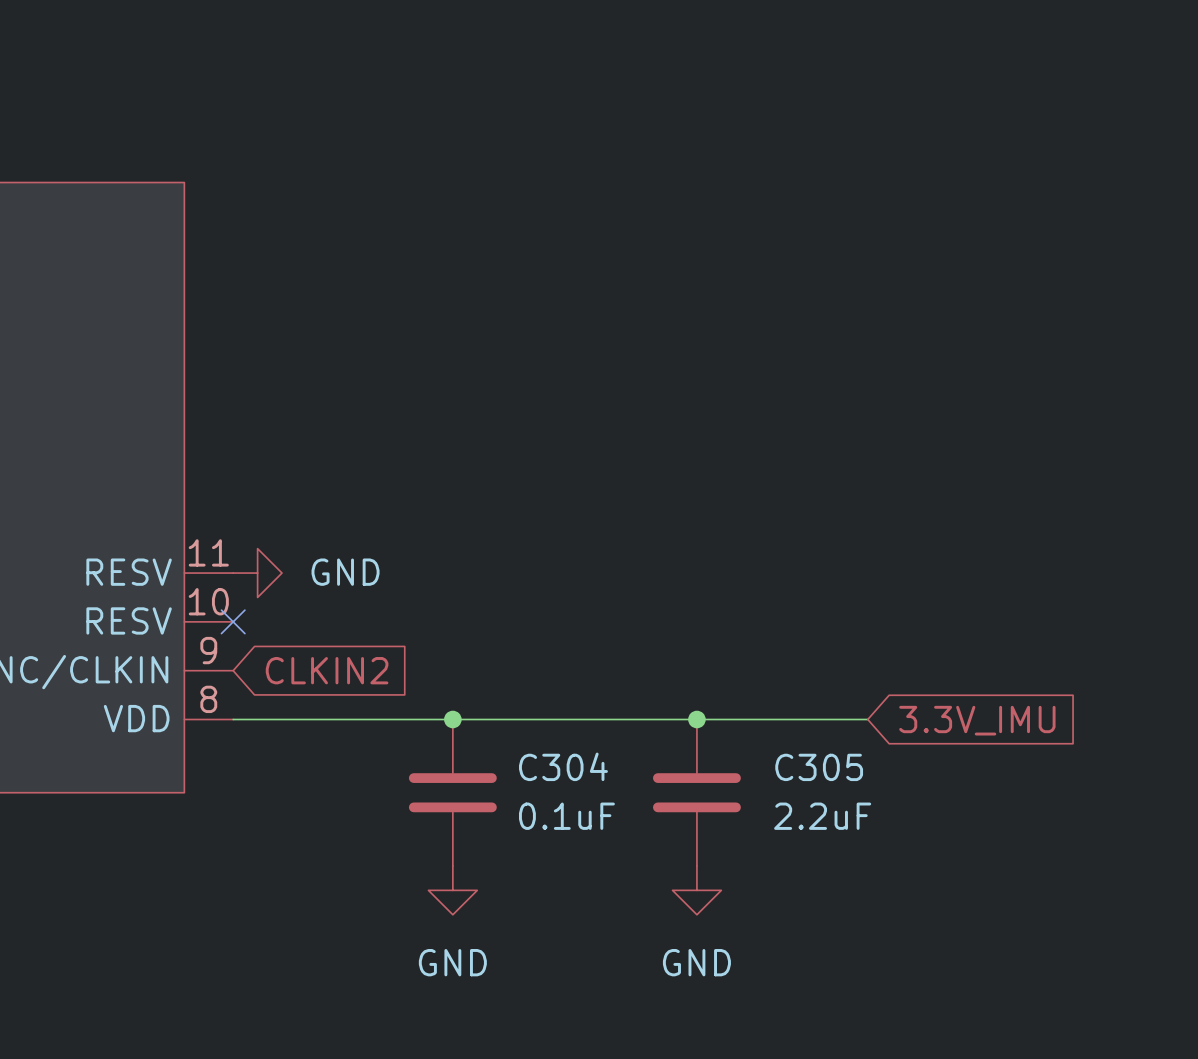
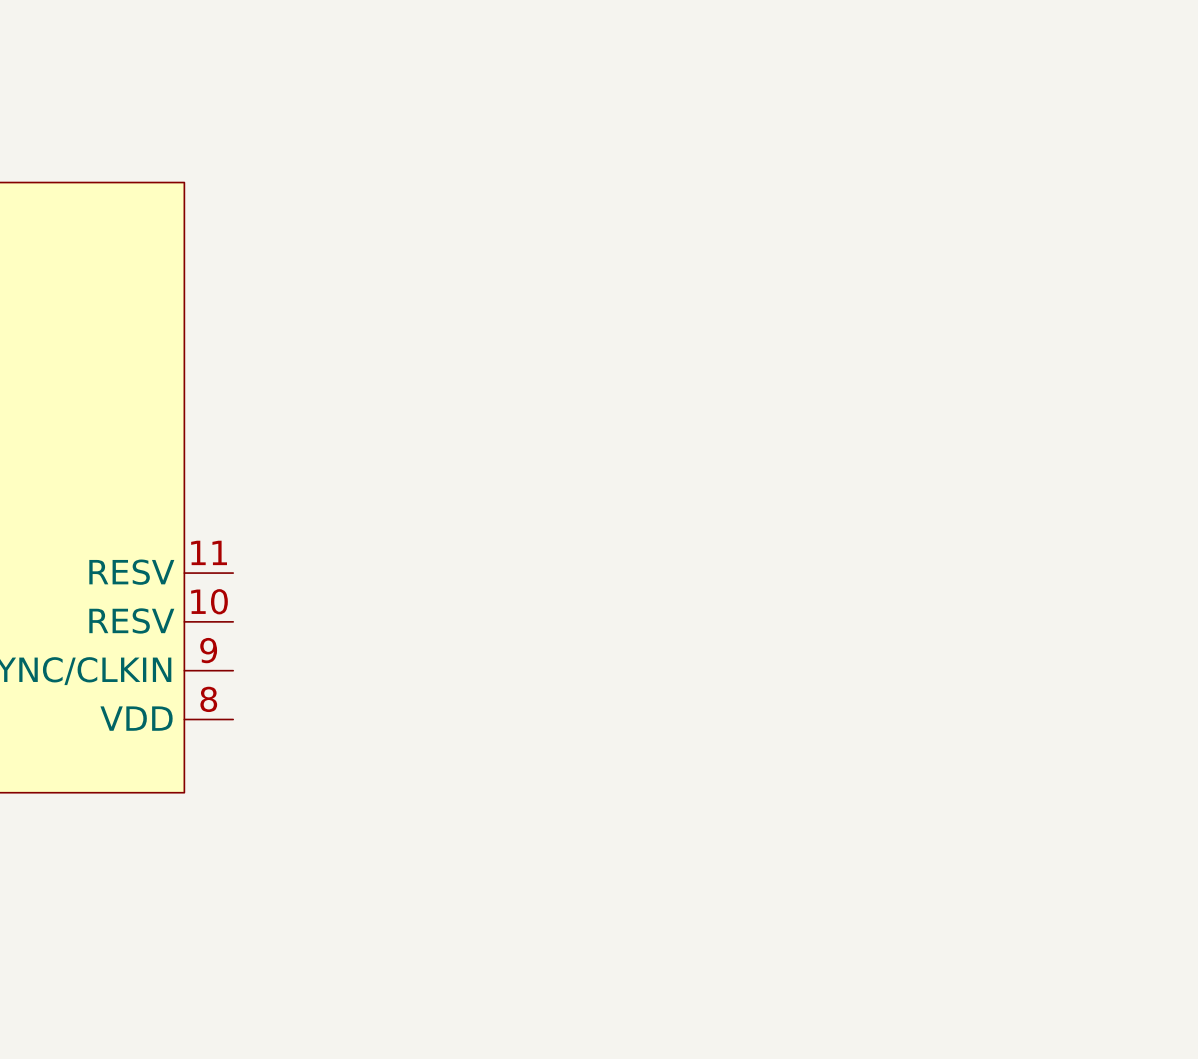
power symbol: GND (257, 573) -> none
no-connect mark: (233, 621) -> none
global label: CLKIN2 (327, 670) -> none
wire: (233, 719) (867, 719) -> none
junction: (452, 719) -> none
junction: (696, 719) -> none
global label: 3.3V_IMU (977, 720) -> none
C304: 0.1uF (452, 792) -> none
C305: 2.2uF (696, 792) -> none
power symbol: GND (452, 890) -> none
power symbol: GND (696, 890) -> none

